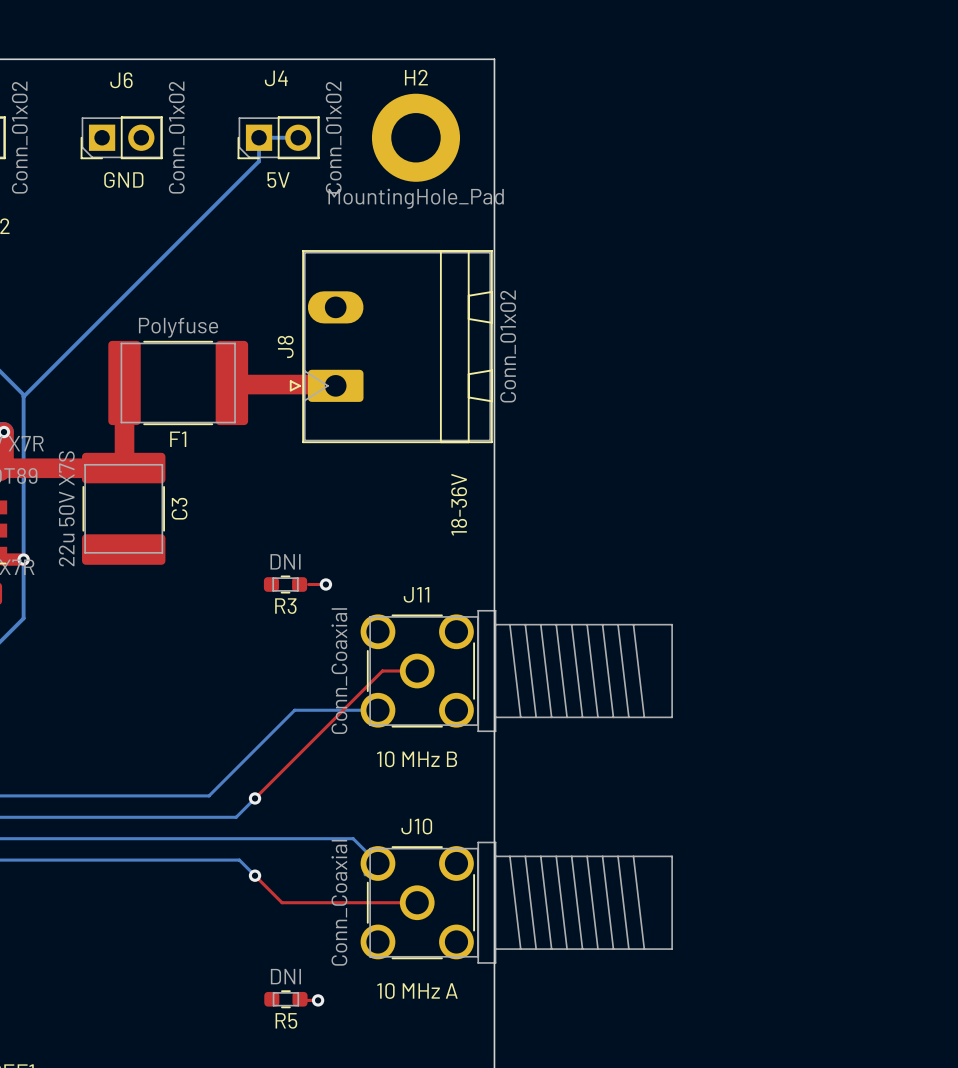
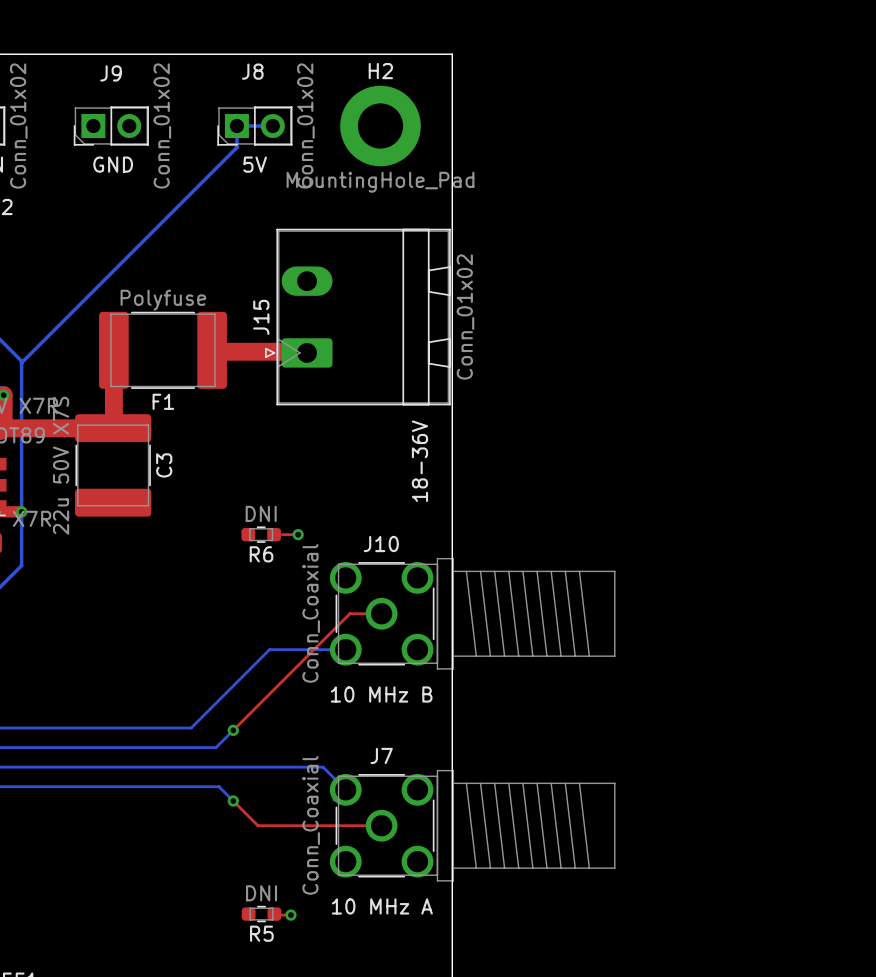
J4 name: J4 (276, 78) -> J8 (252, 71)
J6 name: J6 (121, 80) -> J9 (110, 73)
J8 name: J8 (285, 346) -> J15 (261, 317)
J11 name: J11 (416, 594) -> J10 (381, 544)
R3 name: R3 (285, 606) -> R6 (261, 554)
J10 name: J10 (416, 826) -> J7 (381, 755)

